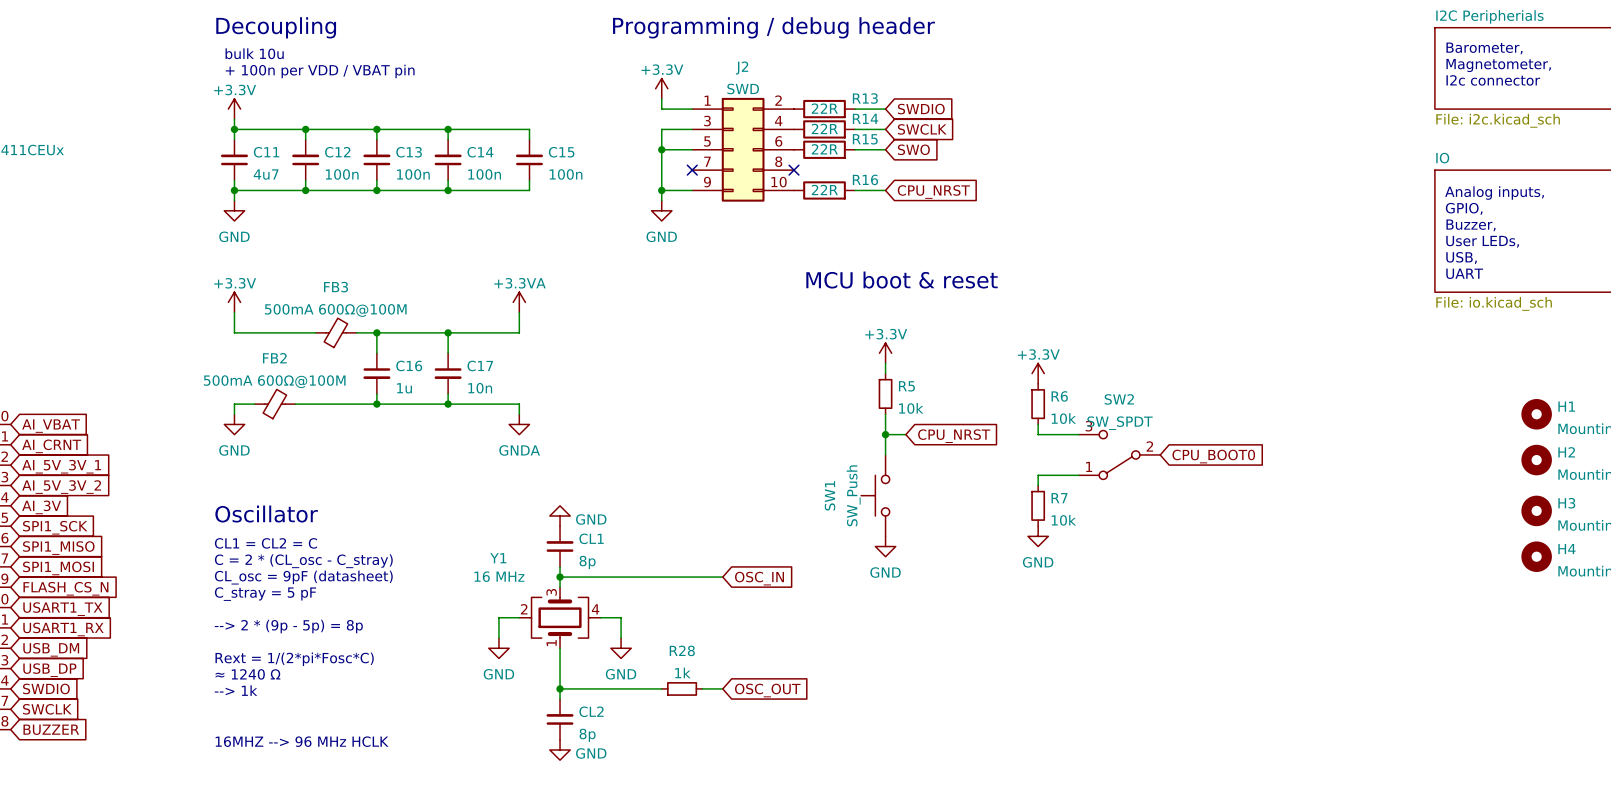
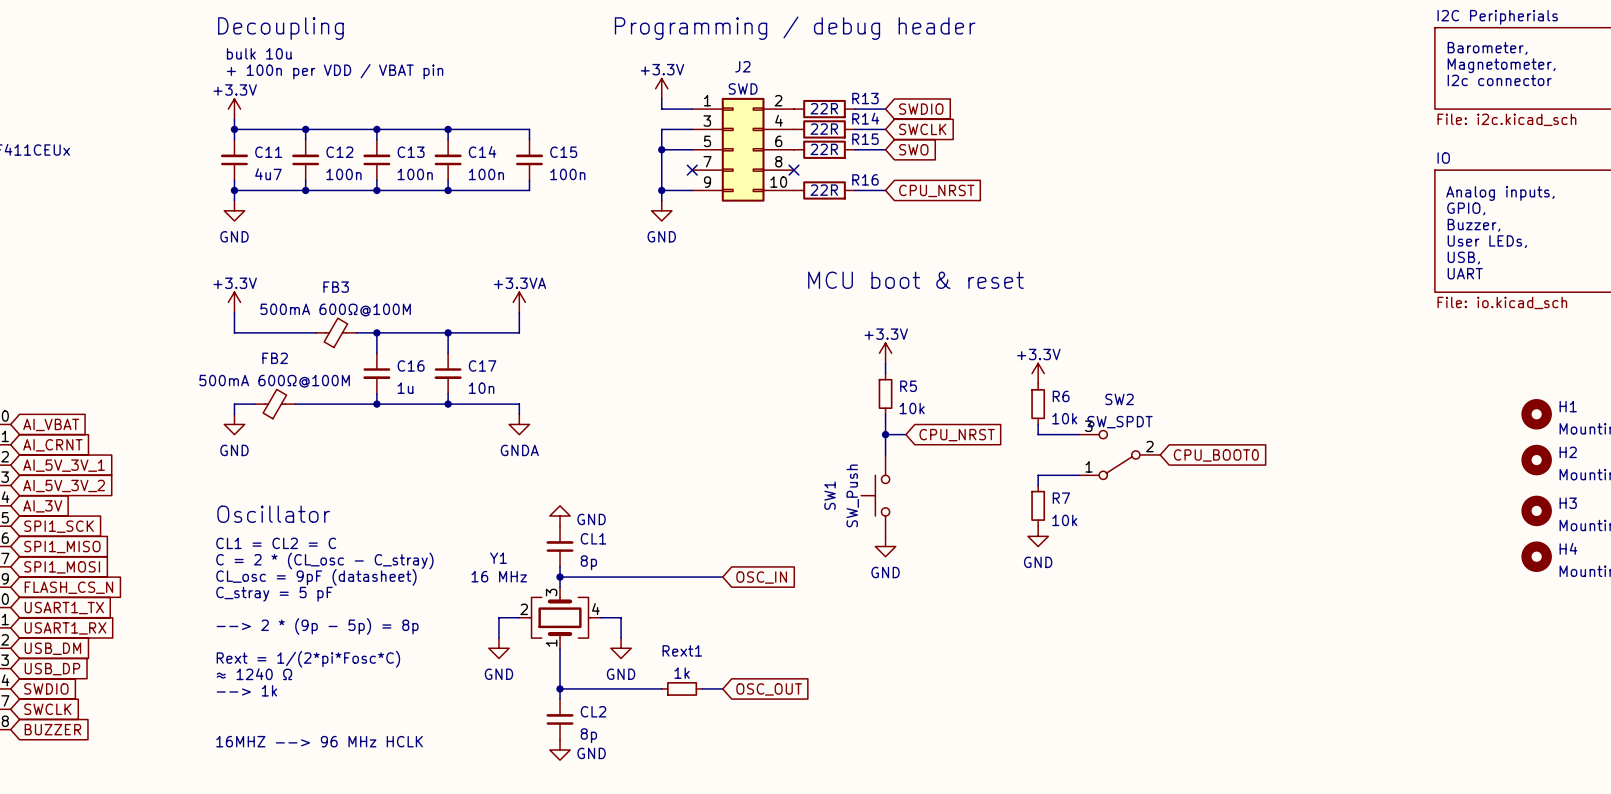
R28 name: R28 (682, 650) -> Rext1 (682, 650)

